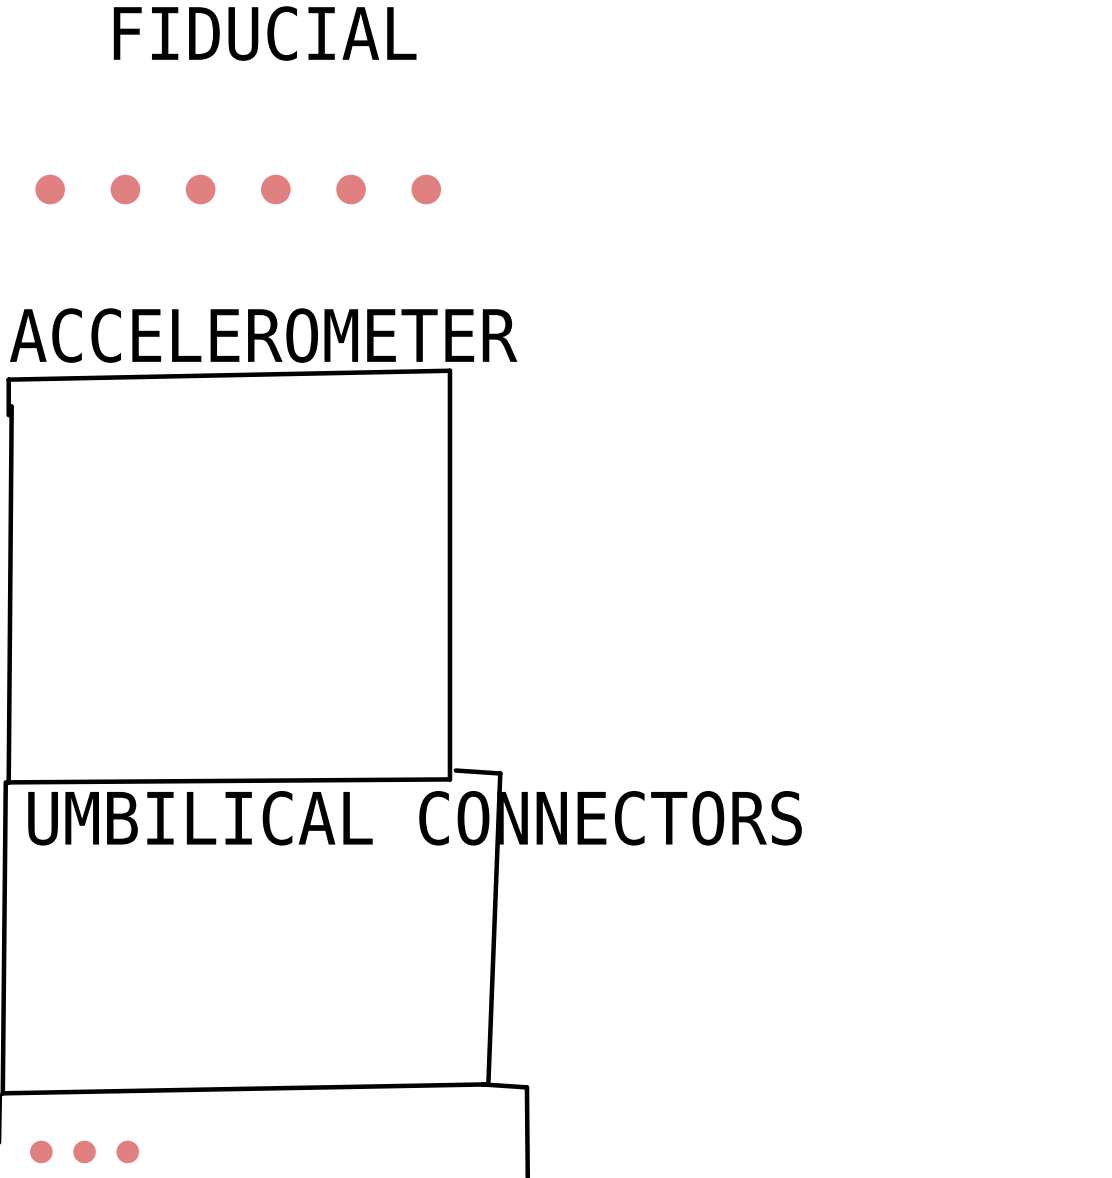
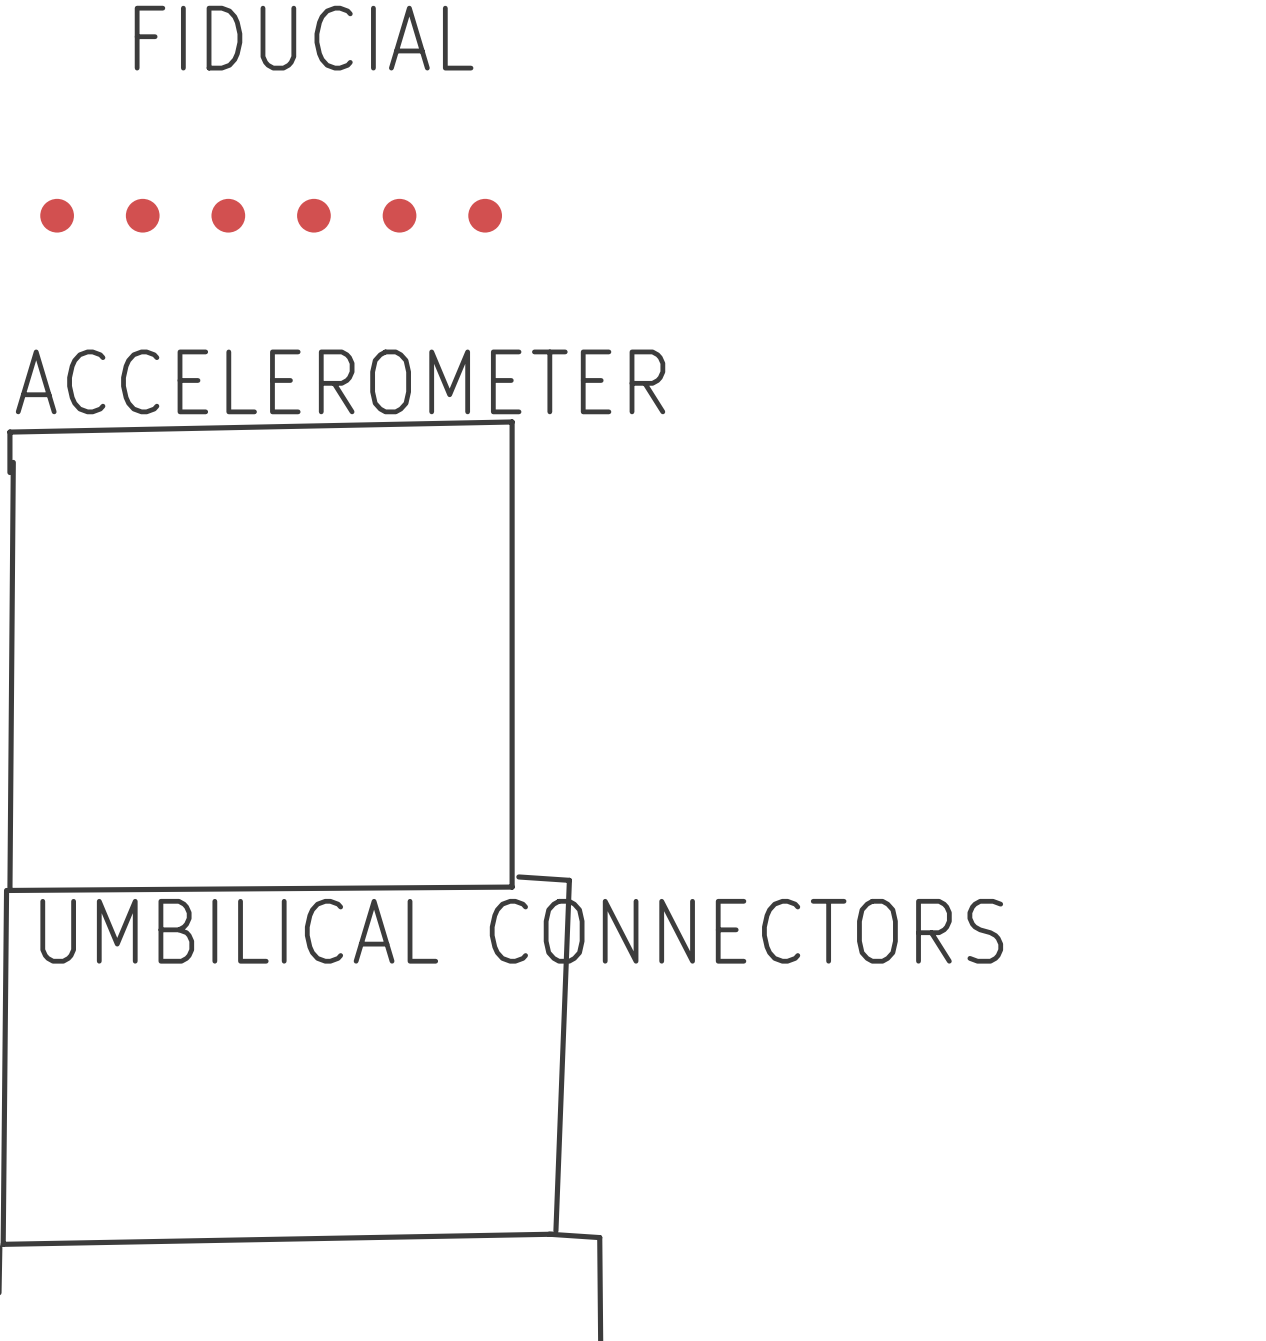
part: (41, 1151) -> none
part: (84, 1151) -> none
part: (127, 1151) -> none

